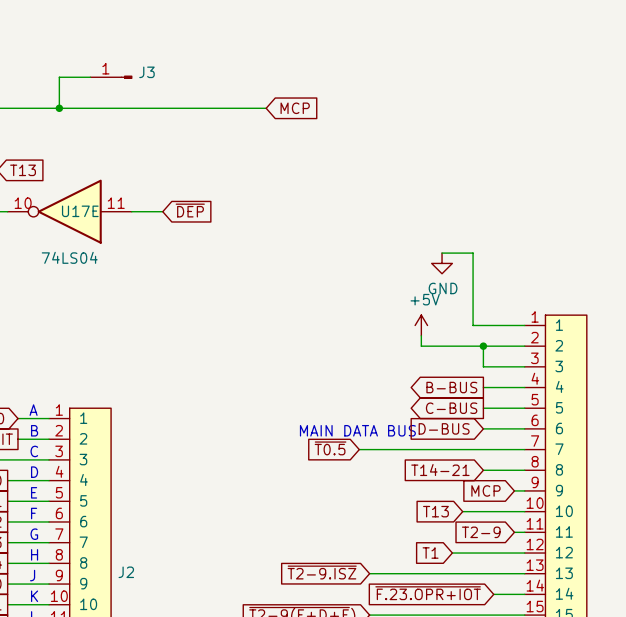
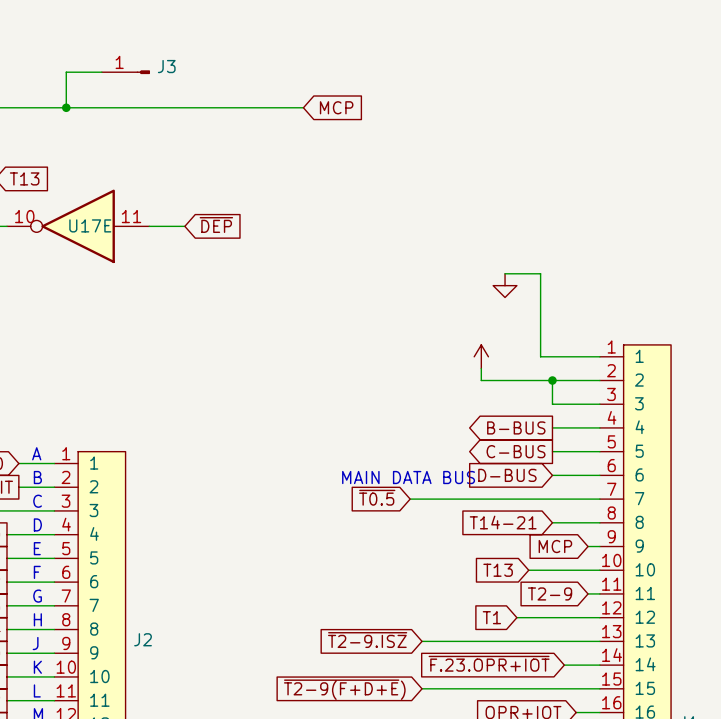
U17E value: 74LS04 (69, 257) -> none
power symbol text: GND (443, 288) -> none
power symbol text: +5V (425, 299) -> none

